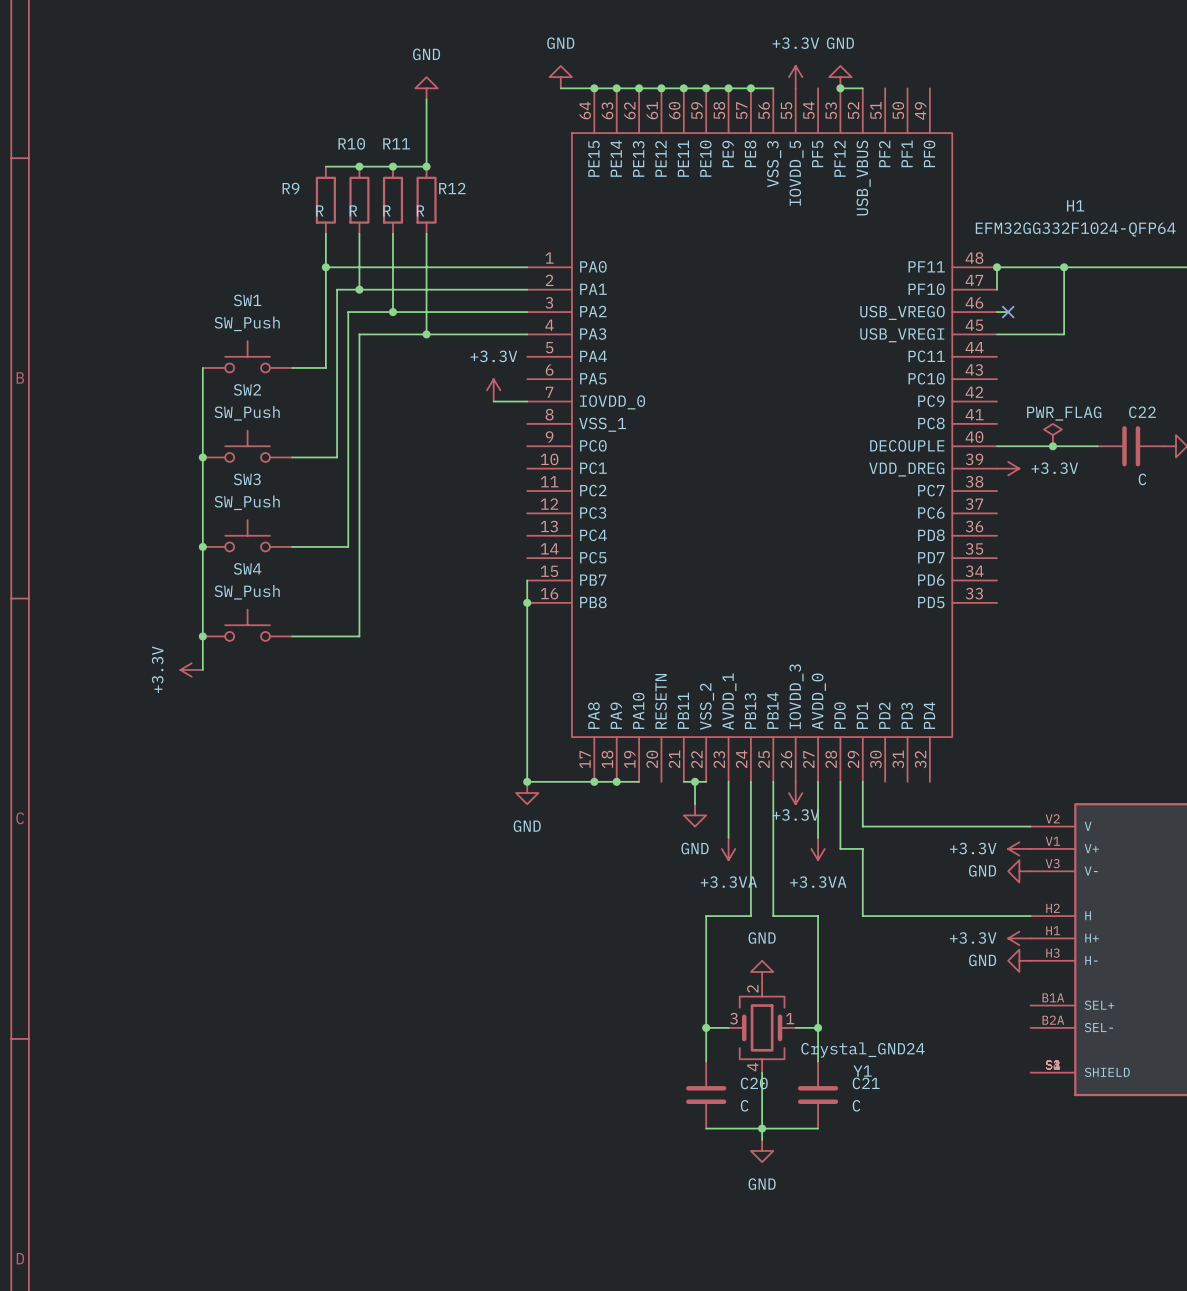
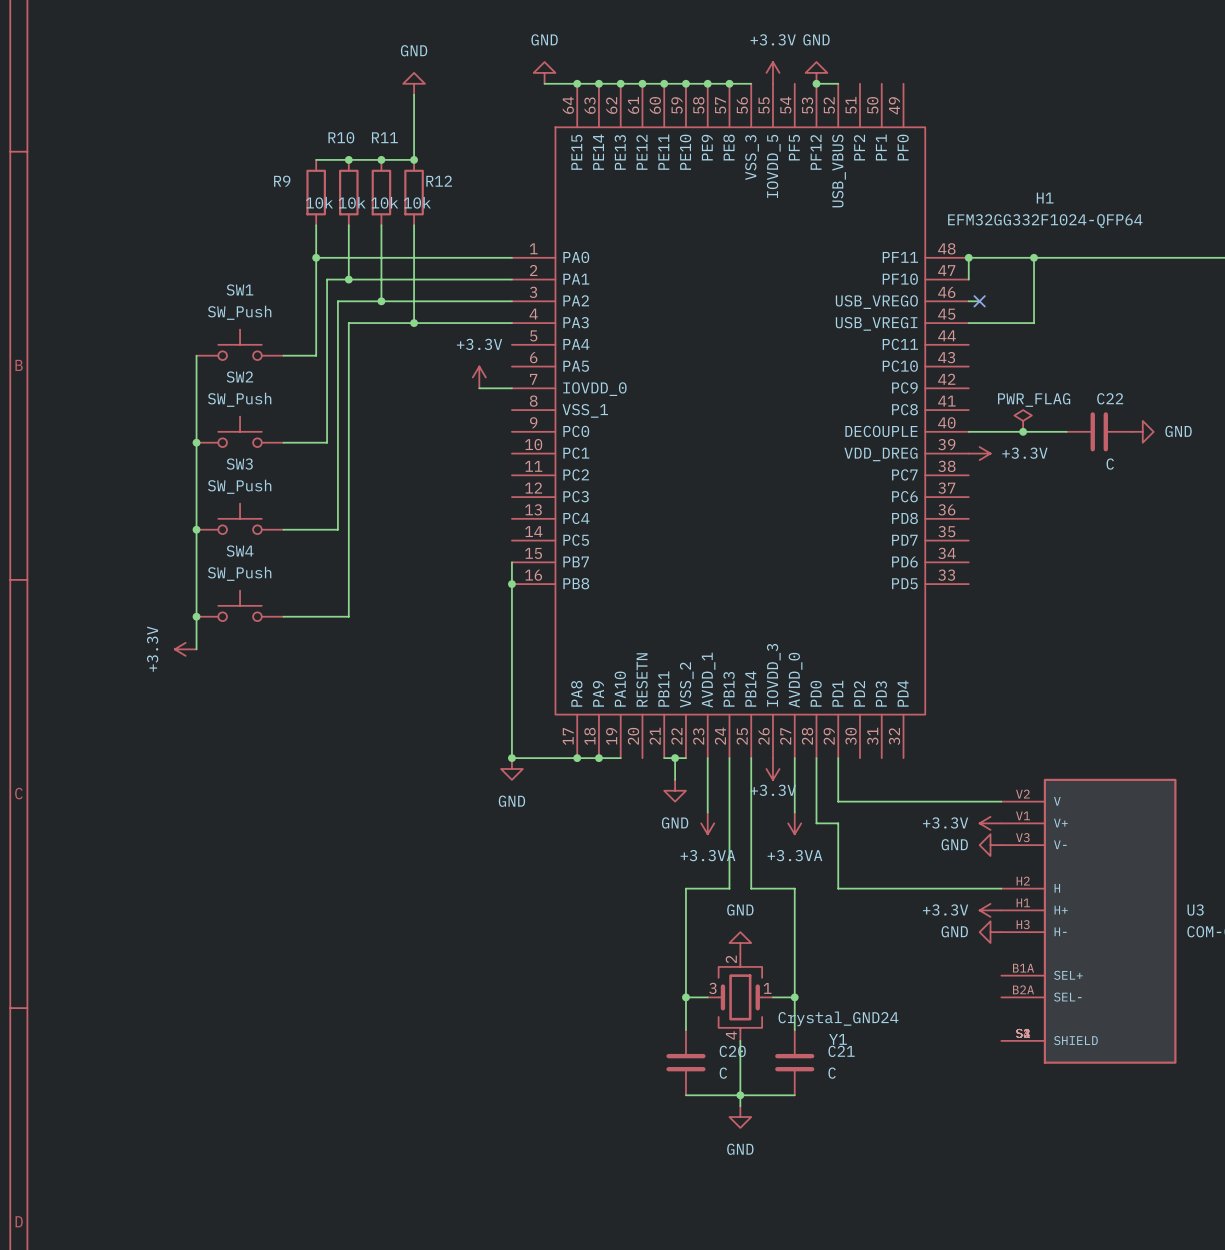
R9 value: R (319, 210) -> 10k (319, 202)
R10 value: R (353, 210) -> 10k (352, 202)
R11 value: R (386, 210) -> 10k (384, 202)
R12 value: R (420, 210) -> 10k (417, 202)

